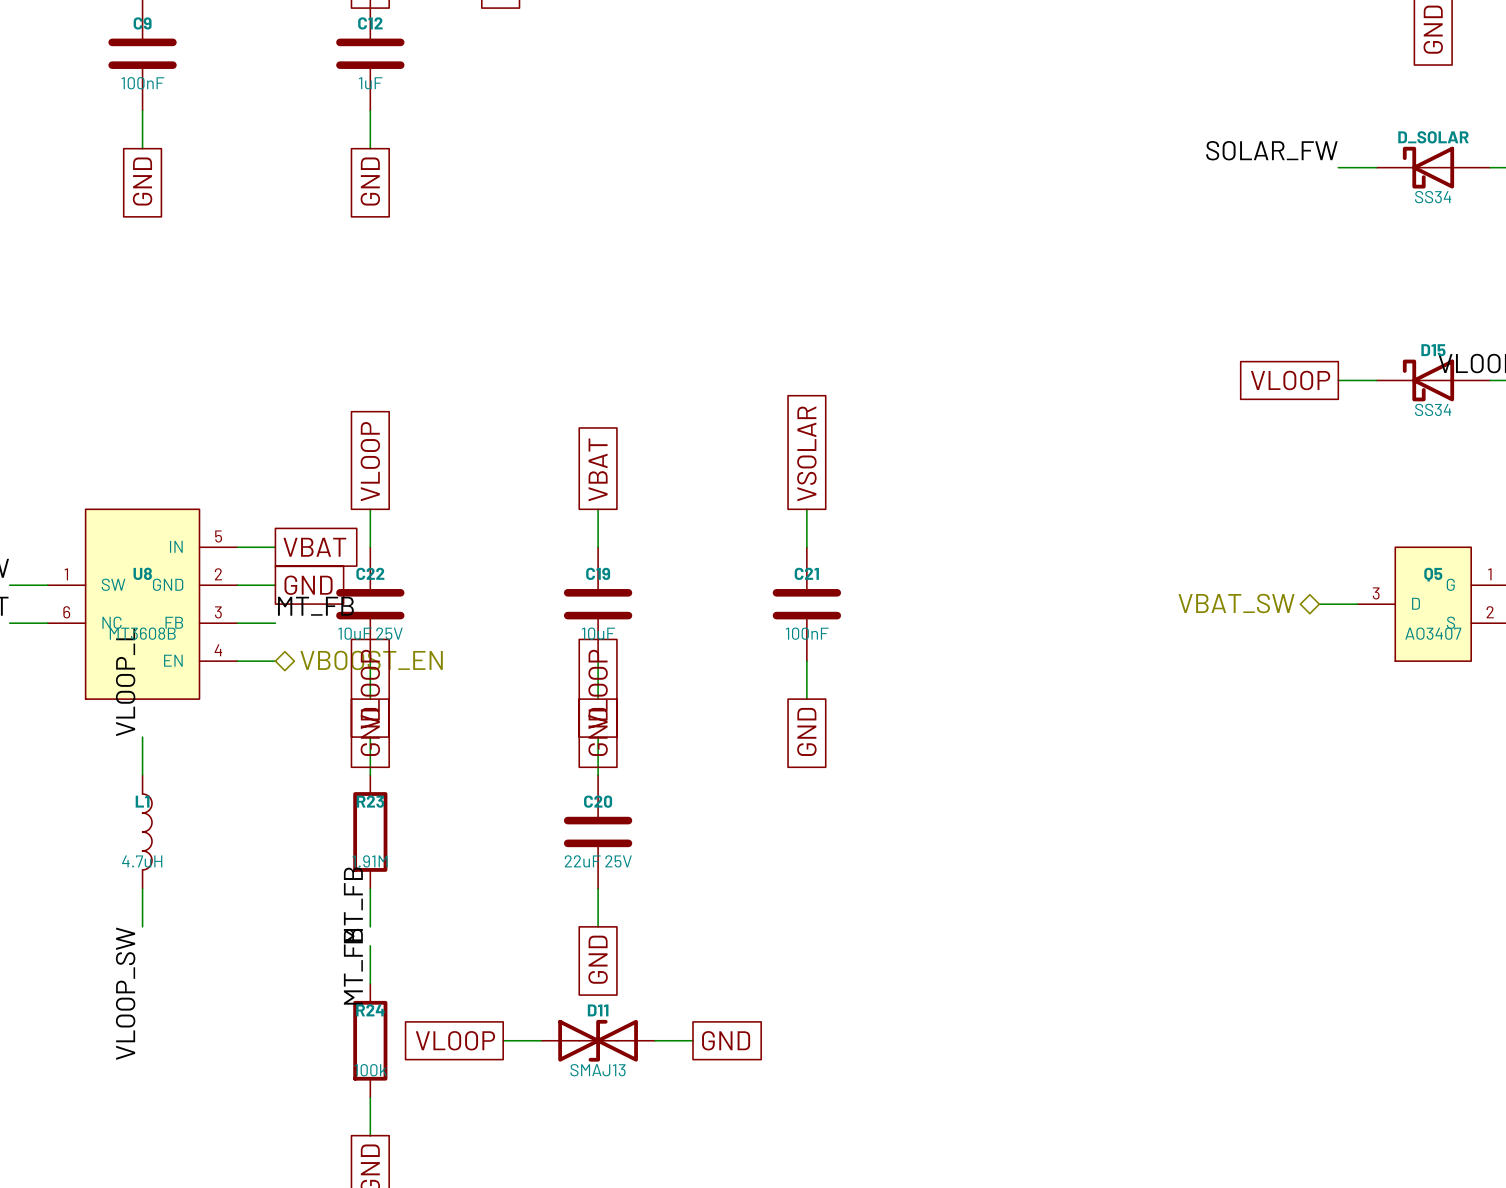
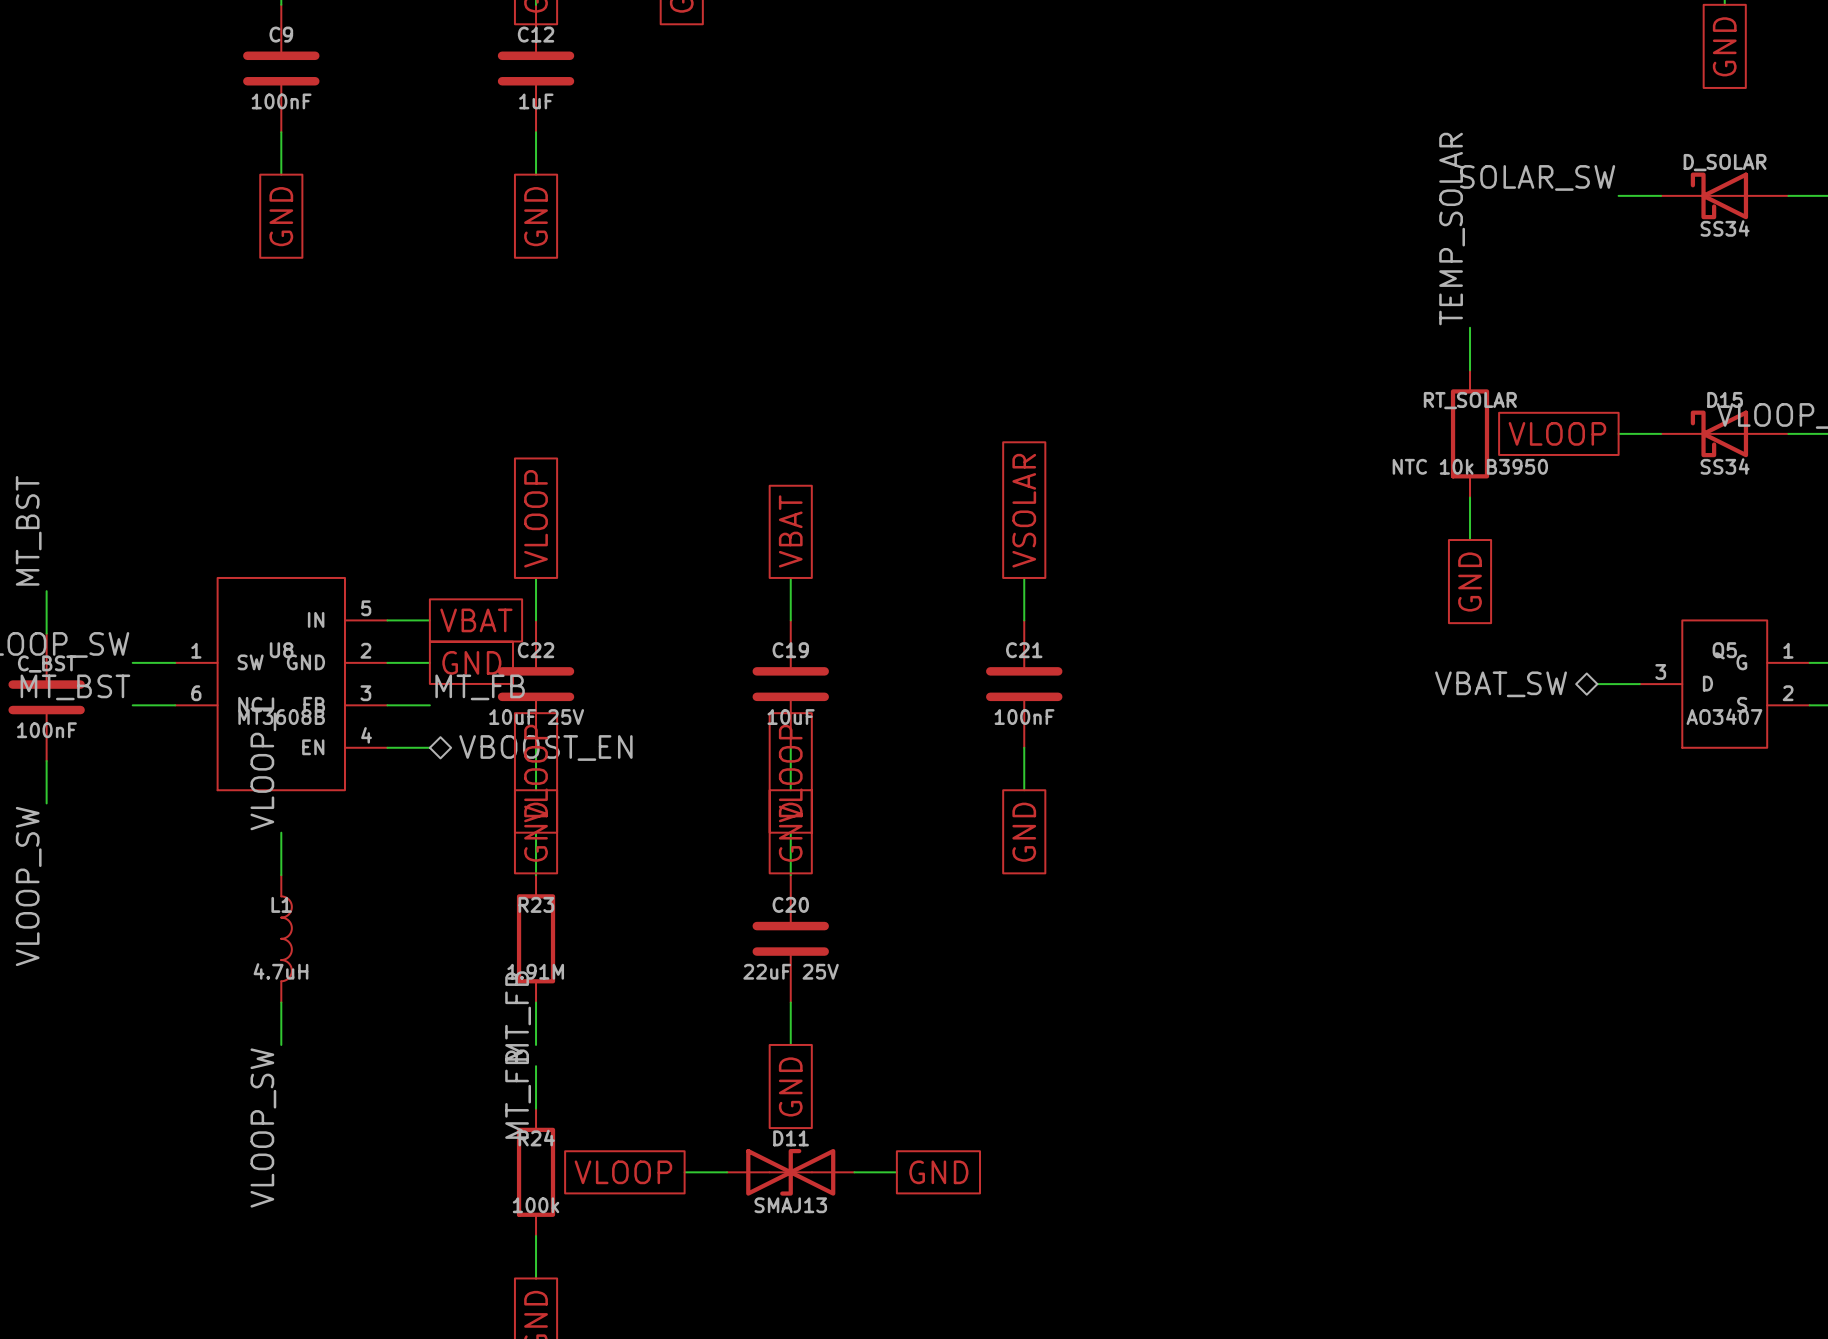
label: SOLAR_FW (1271, 150) -> SOLAR_SW (1537, 177)
label: none -> TEMP_SOLAR (1452, 229)
wire: none -> (1470, 327) (1470, 370)
RT_SOLAR: none -> NTC 10k B3950 (1470, 433)
wire: none -> (1470, 497) (1470, 540)
global label: none -> GND (1470, 582)

